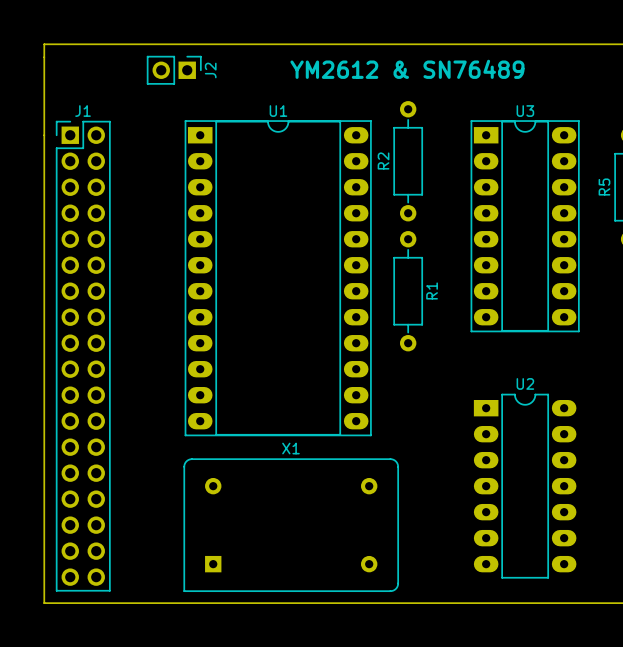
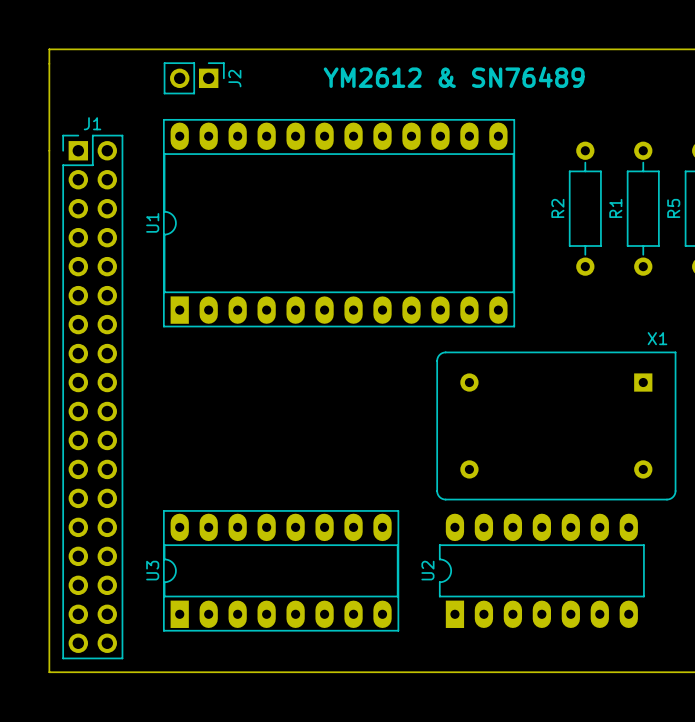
R2 position: (408, 161) -> (585, 208)
U3 rotation: 0° (525, 226) -> 90° counterclockwise (281, 570)
U3 position: (525, 226) -> (281, 570)
U1 rotation: 0° (278, 278) -> 90° counterclockwise (339, 223)
R1 name position: R1 (432, 290) -> R1 (615, 208)
R1 position: (408, 291) -> (643, 208)
X1 name position: X1 (290, 448) -> X1 (657, 338)
U2 rotation: 0° (525, 486) -> 90° counterclockwise (541, 570)
X1 rotation: 0° (291, 525) -> 180° (556, 425)
X1 position: (291, 525) -> (556, 425)

